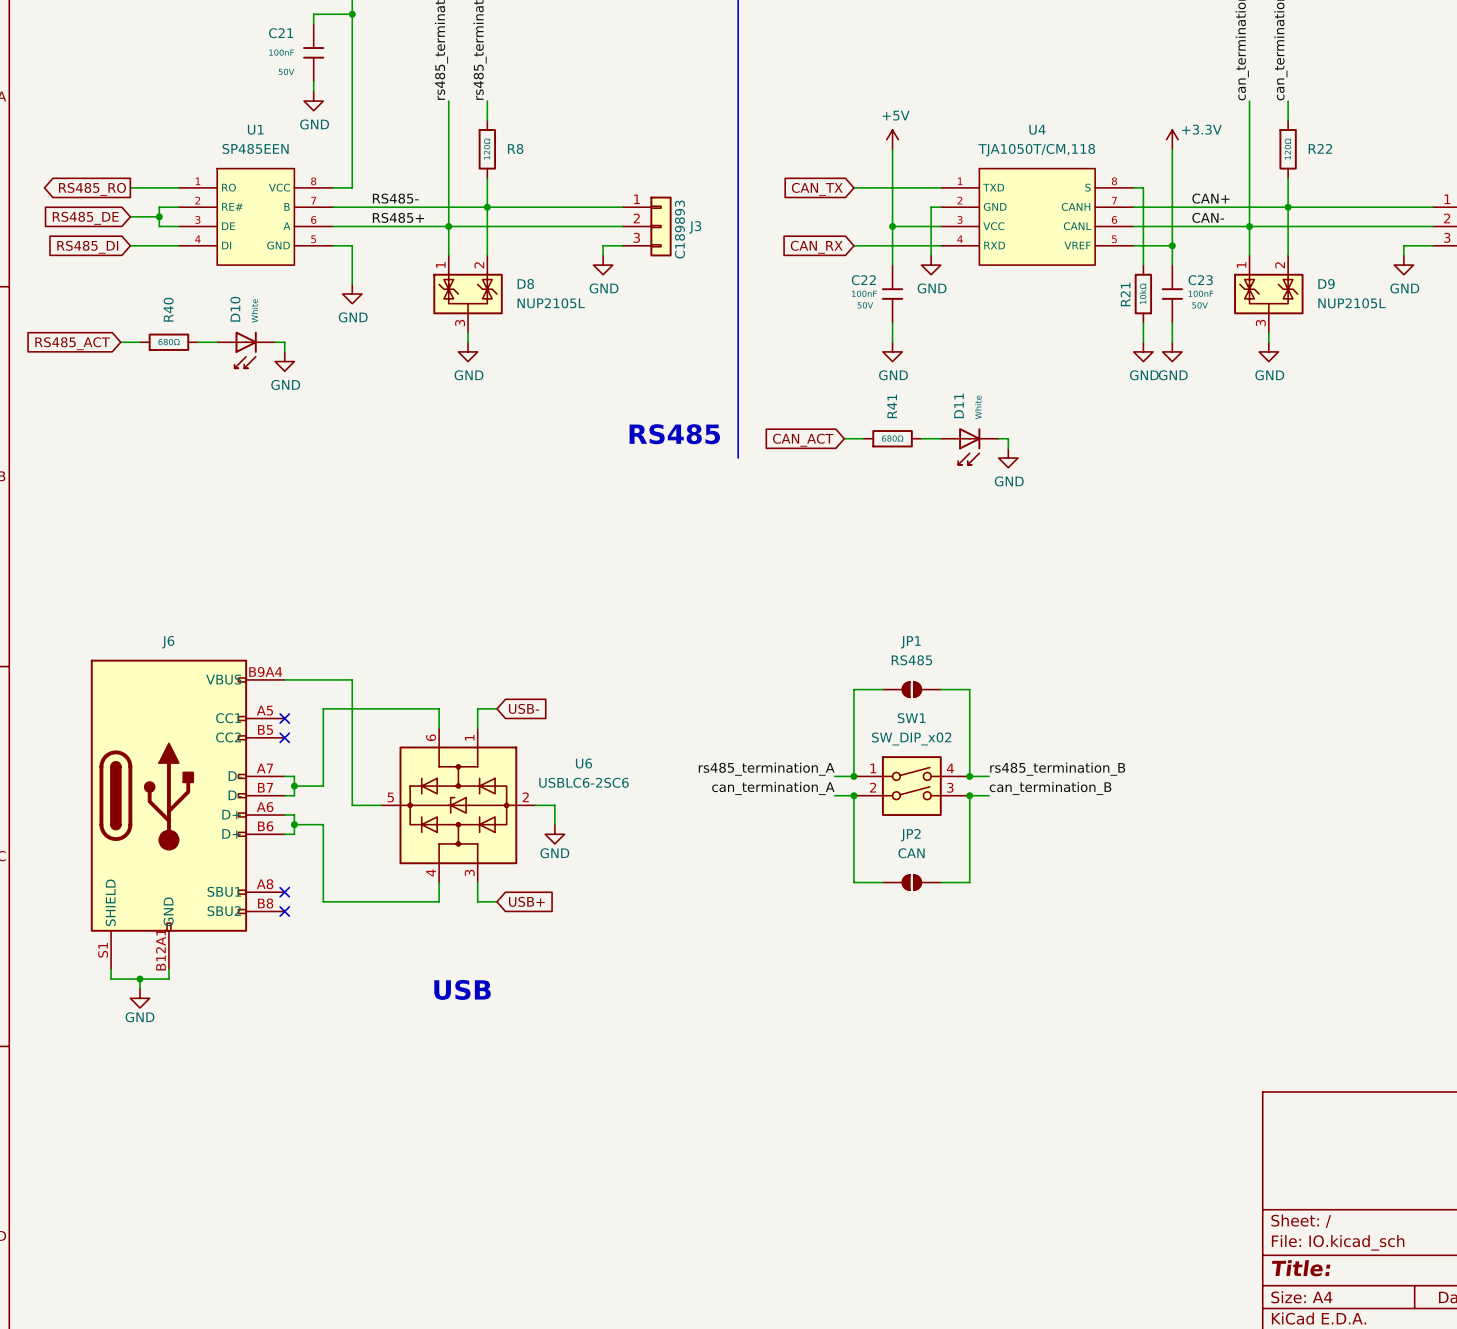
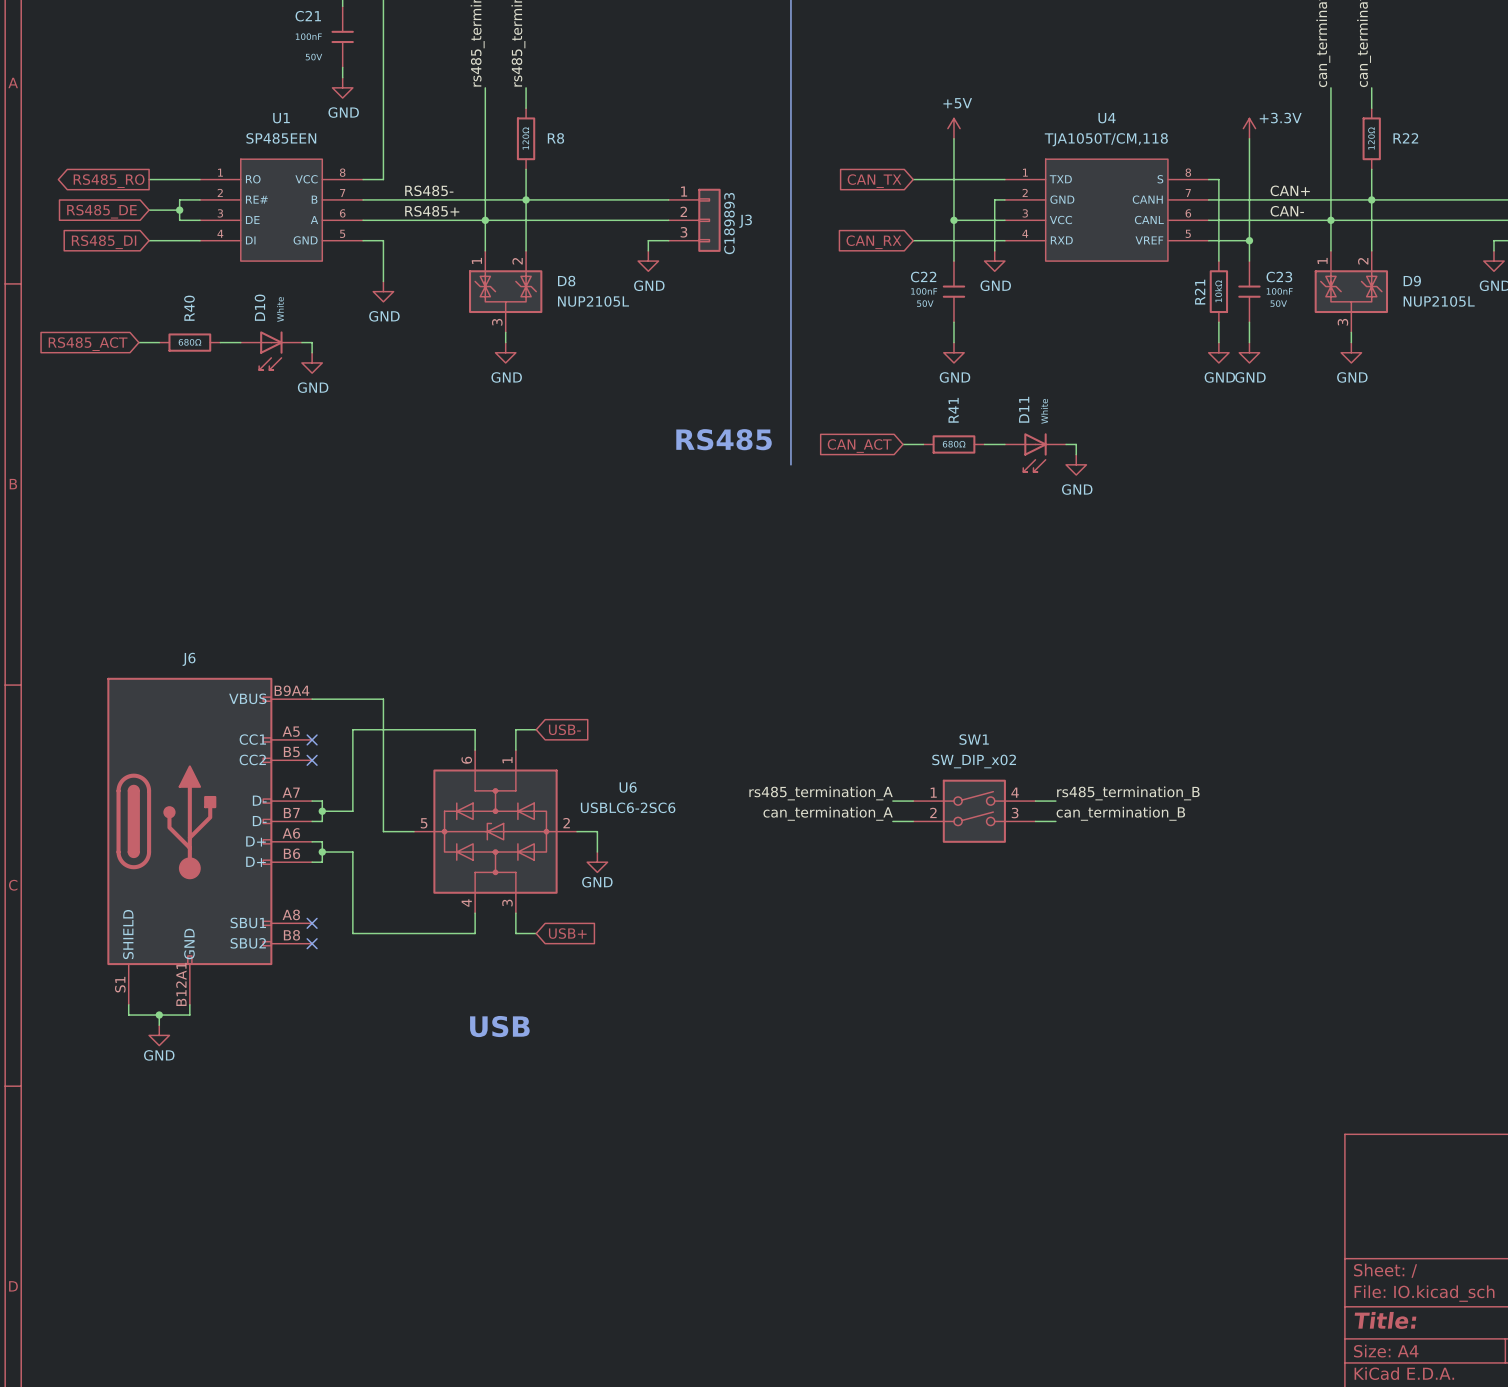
wire: (882, 689) (853, 689) (853, 776) -> none
JP1: RS485 (911, 689) -> none
wire: (940, 689) (969, 689) (969, 776) -> none
junction: (853, 776) -> none
junction: (969, 776) -> none
wire: (853, 795) (853, 882) (882, 882) -> none
junction: (853, 795) -> none
wire: (969, 795) (969, 882) (940, 882) -> none
junction: (969, 795) -> none
JP2: CAN (911, 882) -> none

